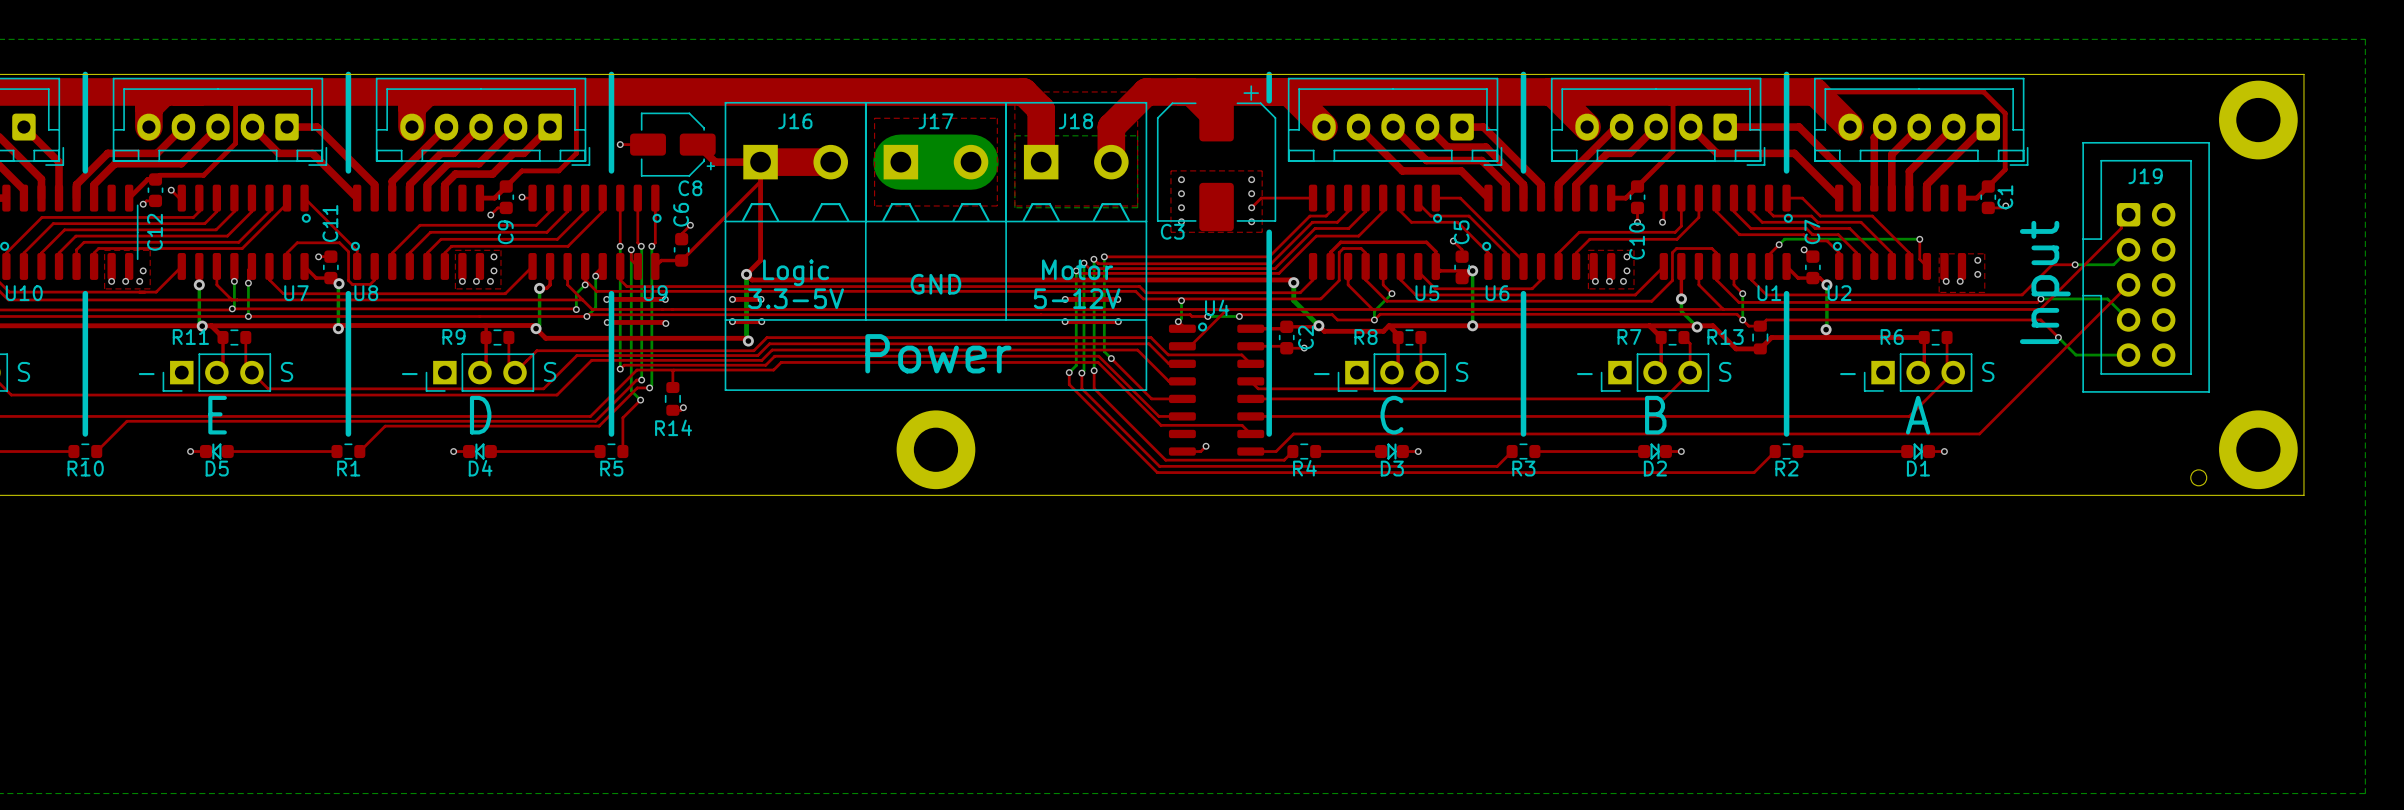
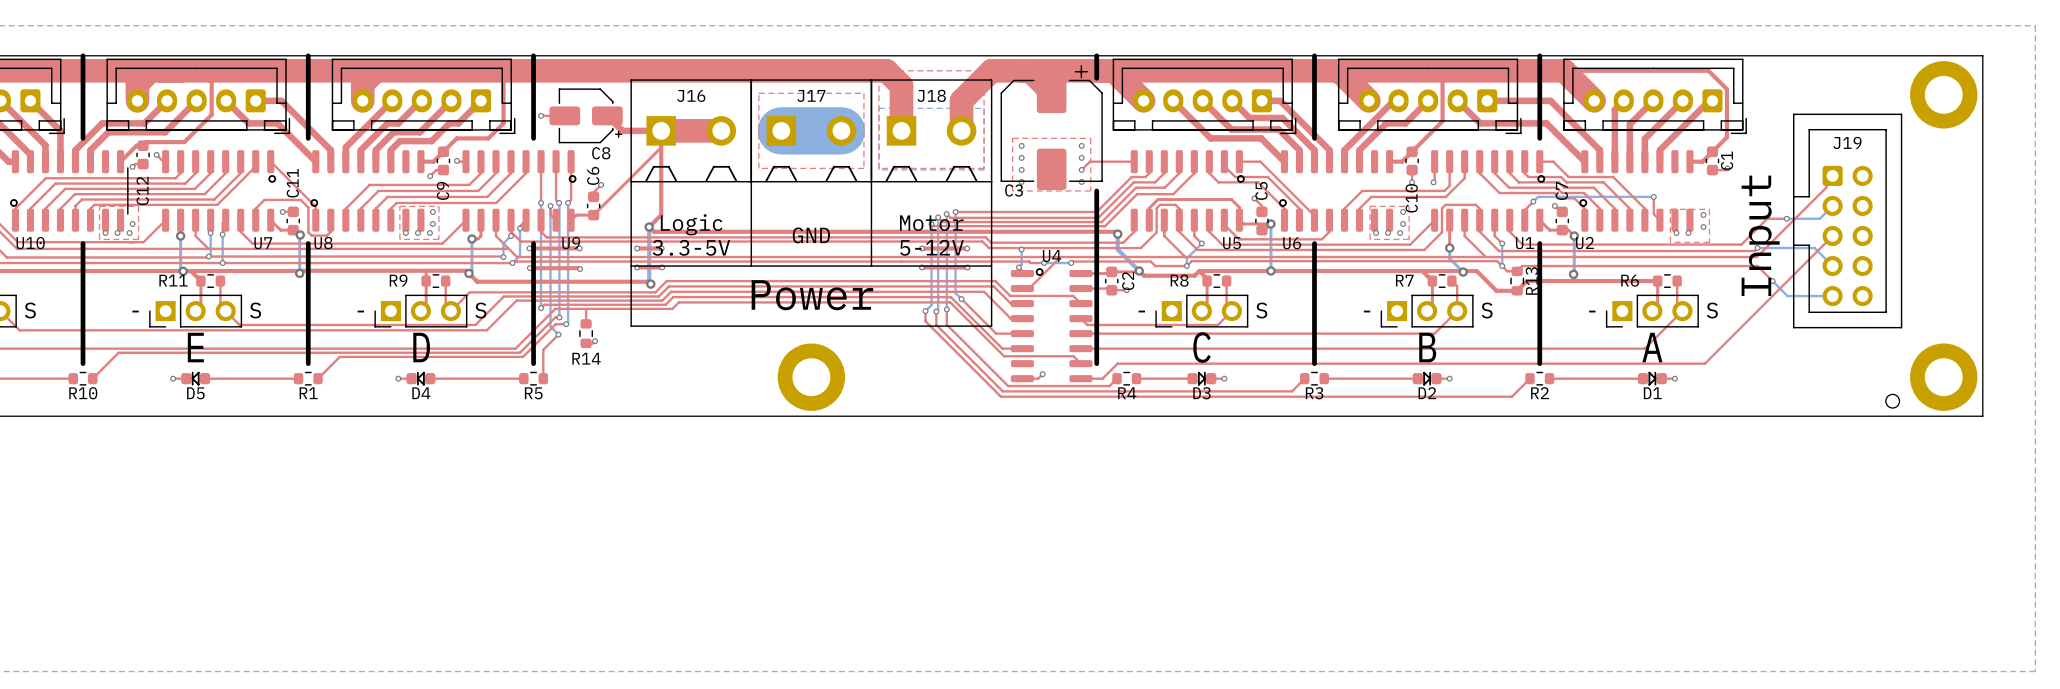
R13 name rotation: 0° (1725, 337) -> 90° counterclockwise (1531, 280)
R13 name position: R13 (1725, 337) -> R13 (1531, 280)

